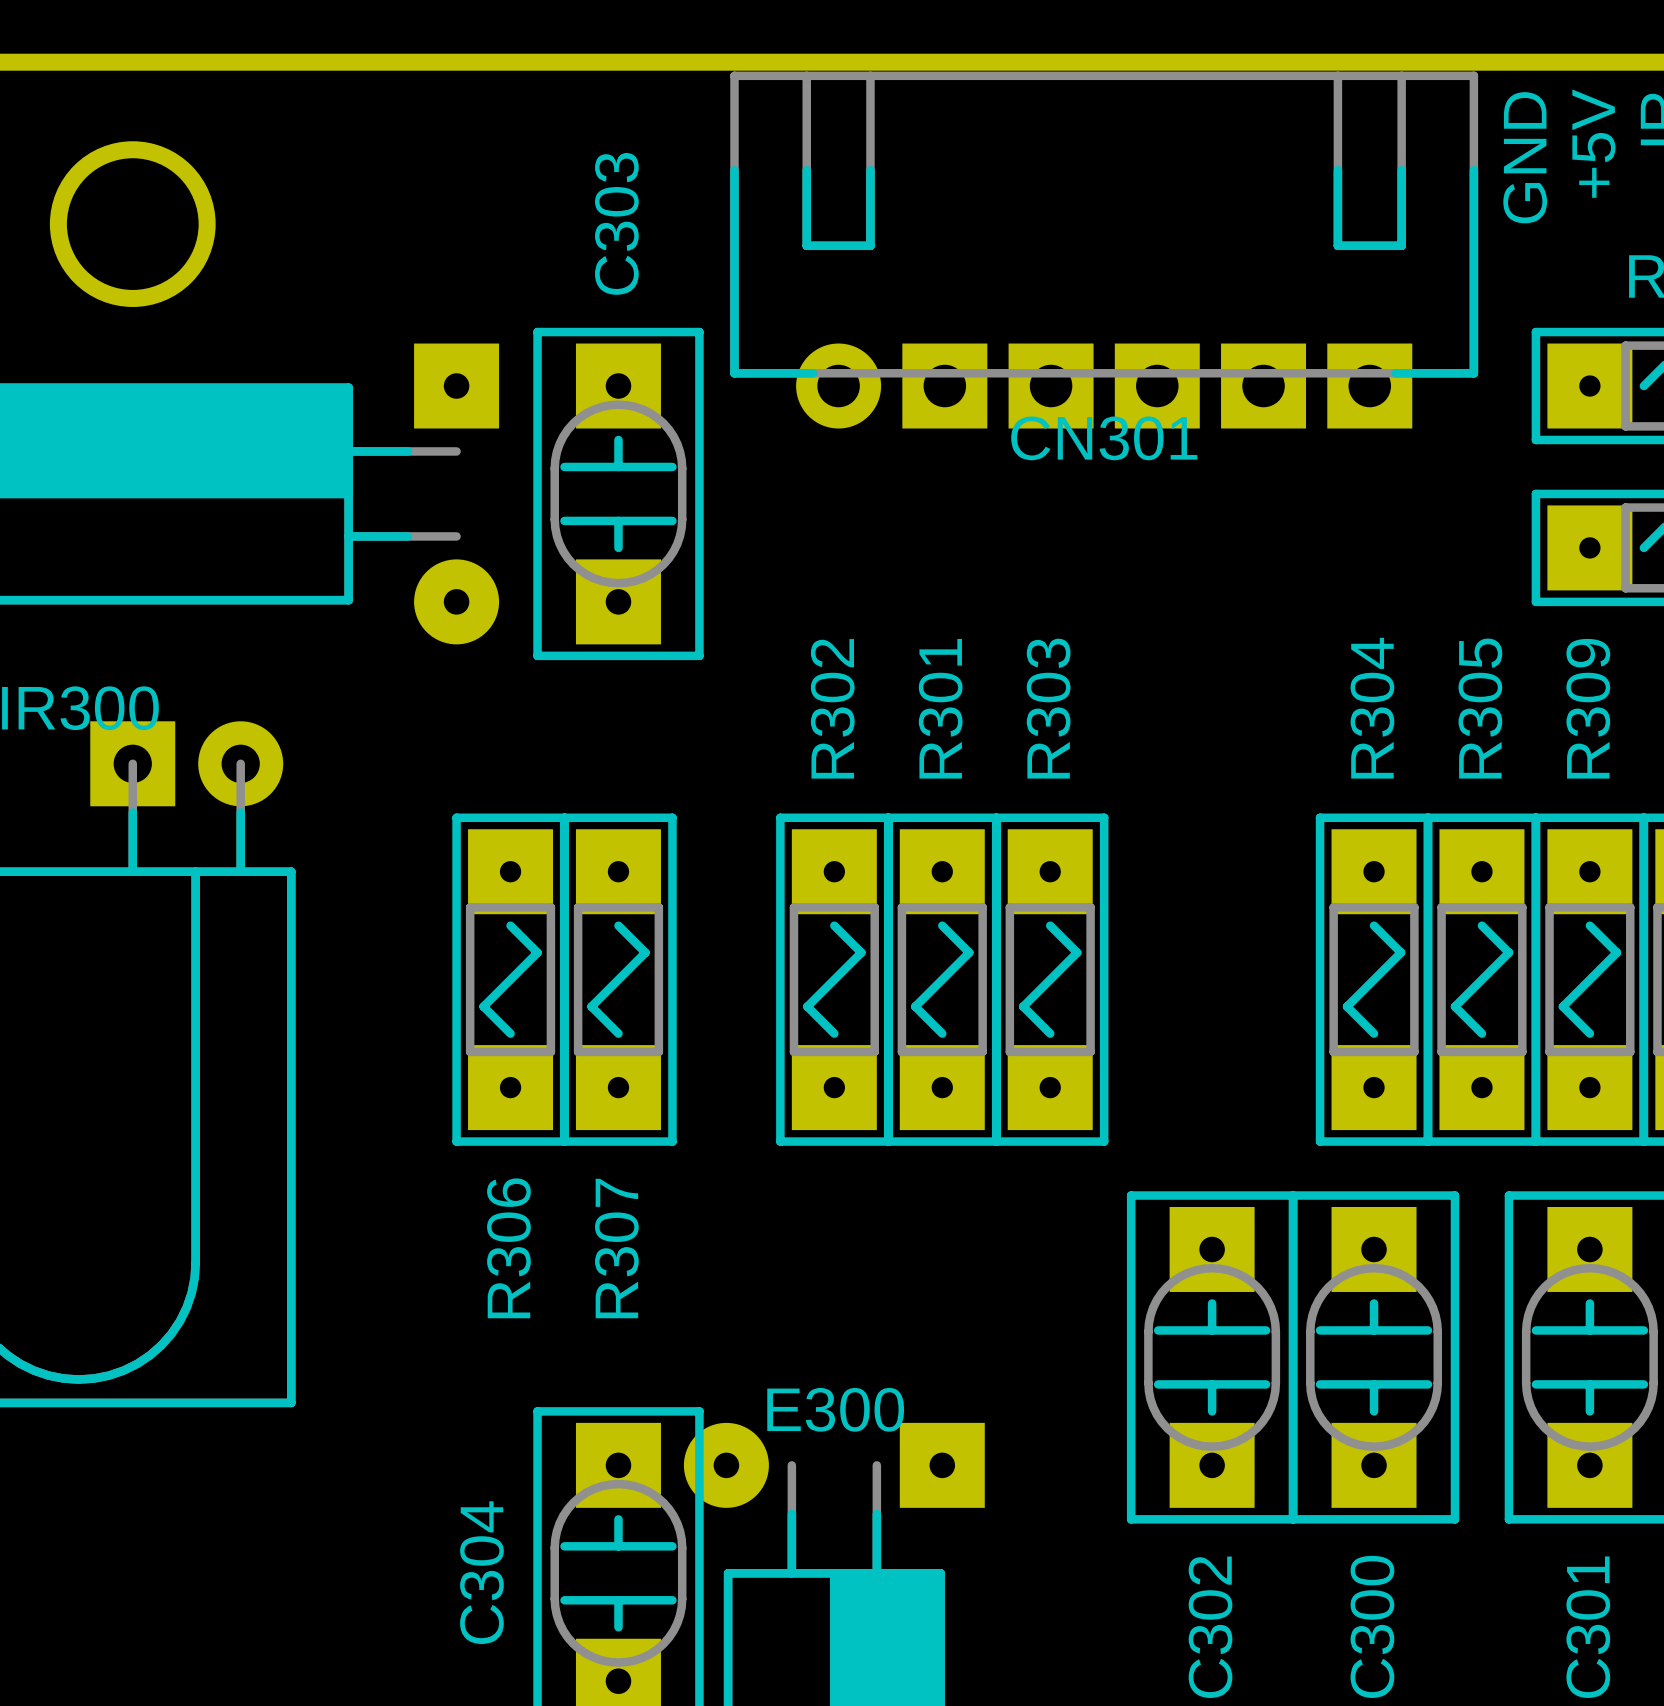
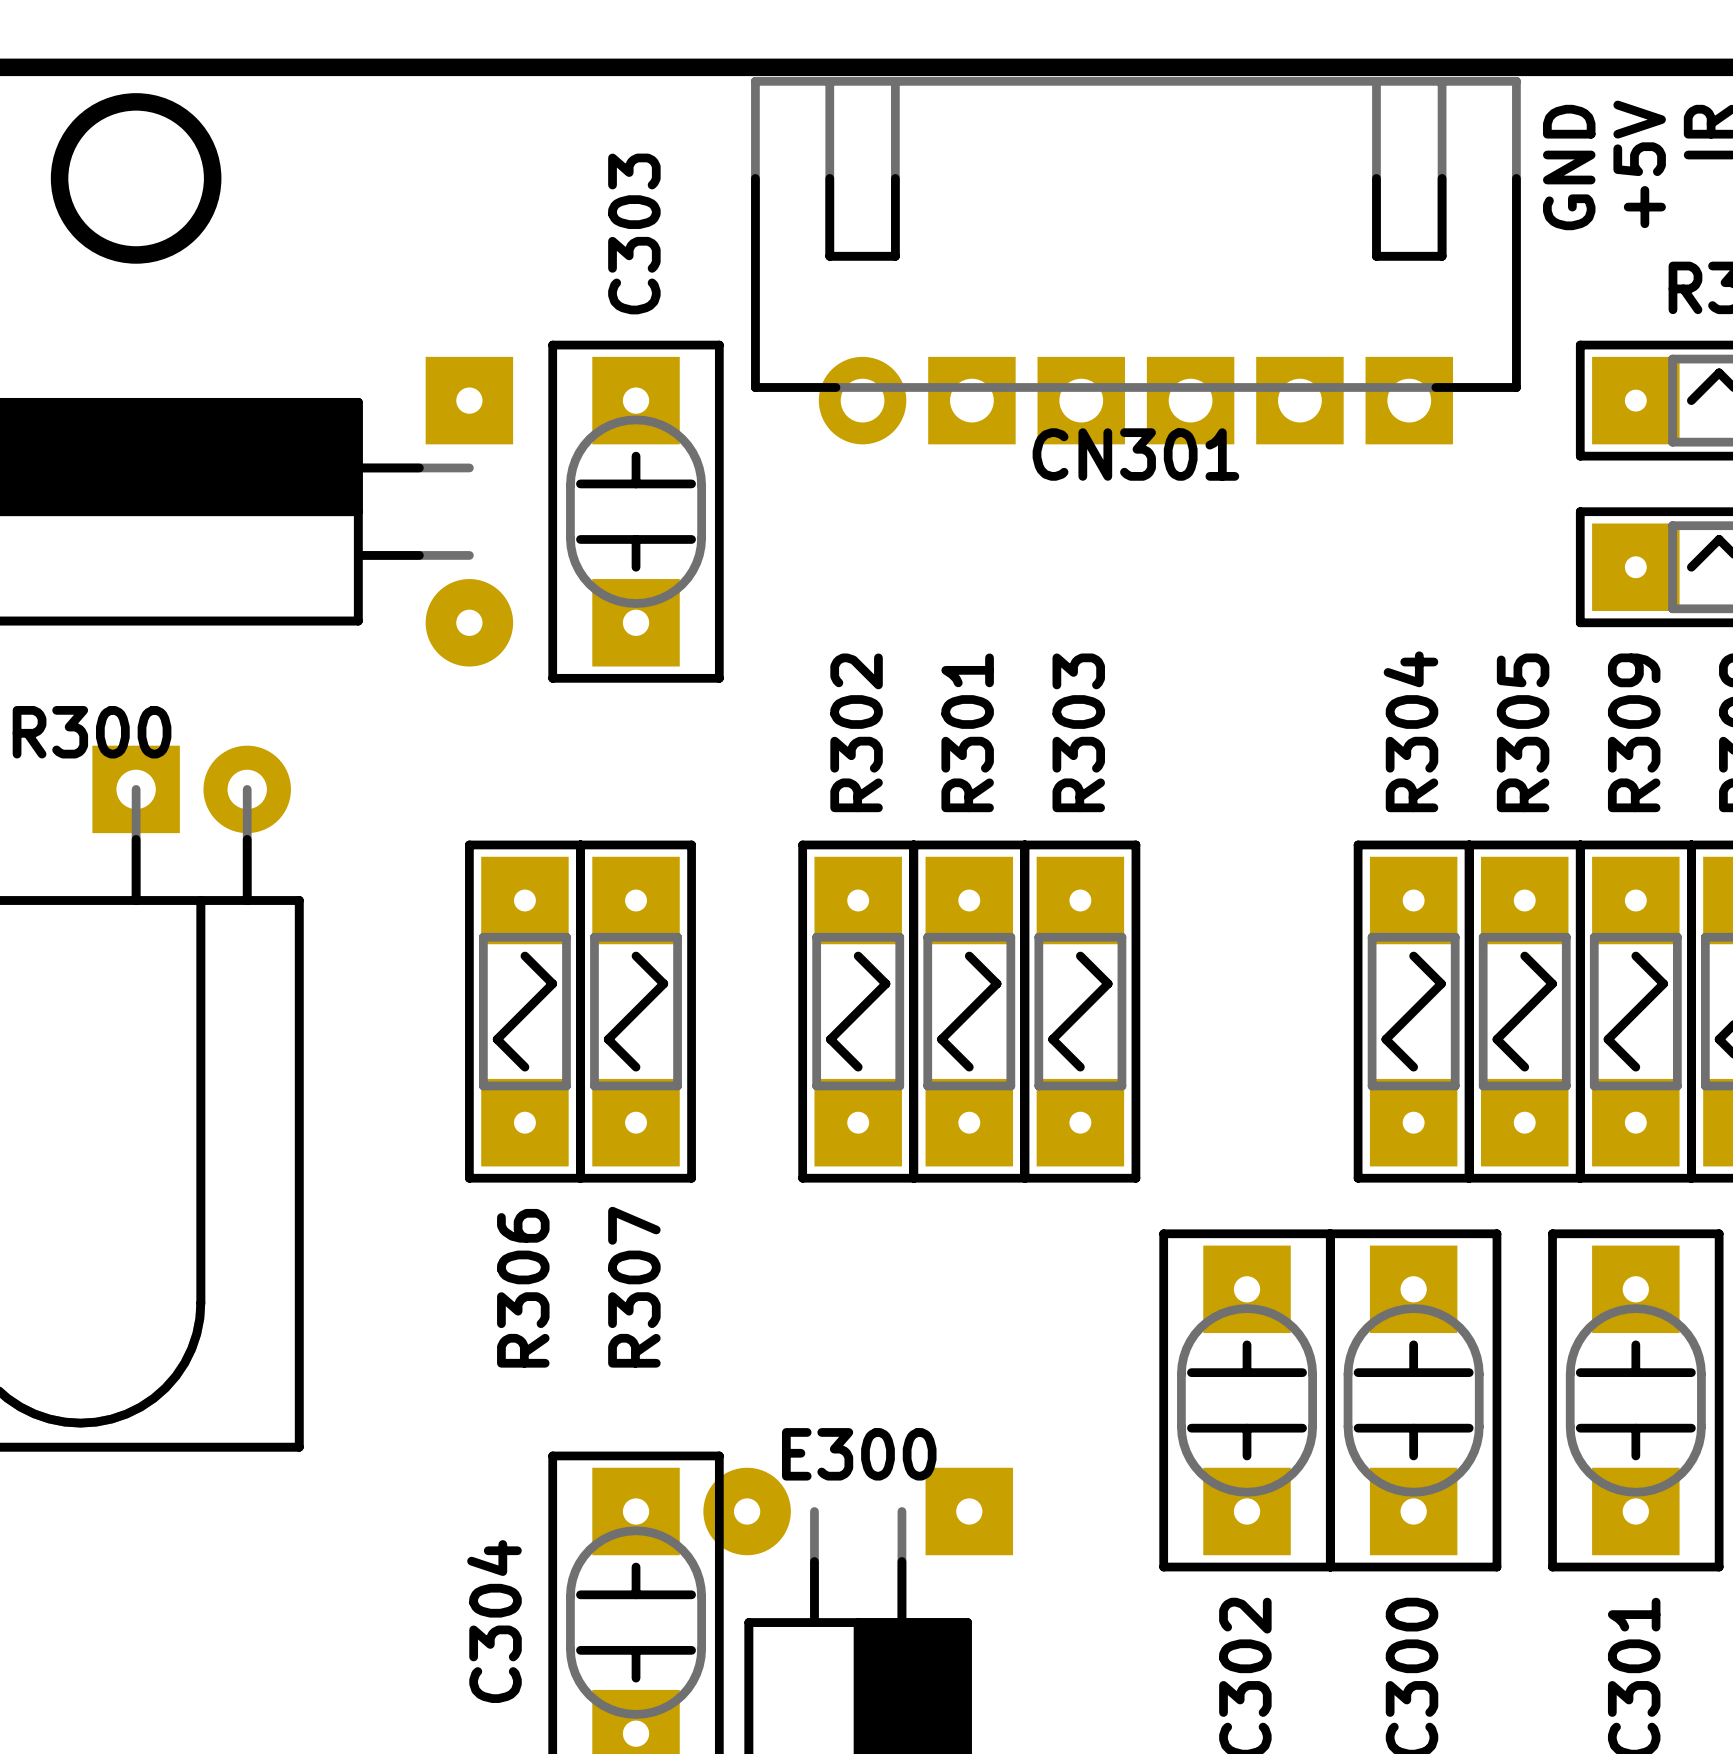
round board edge position: (132, 224) -> (136, 178)

